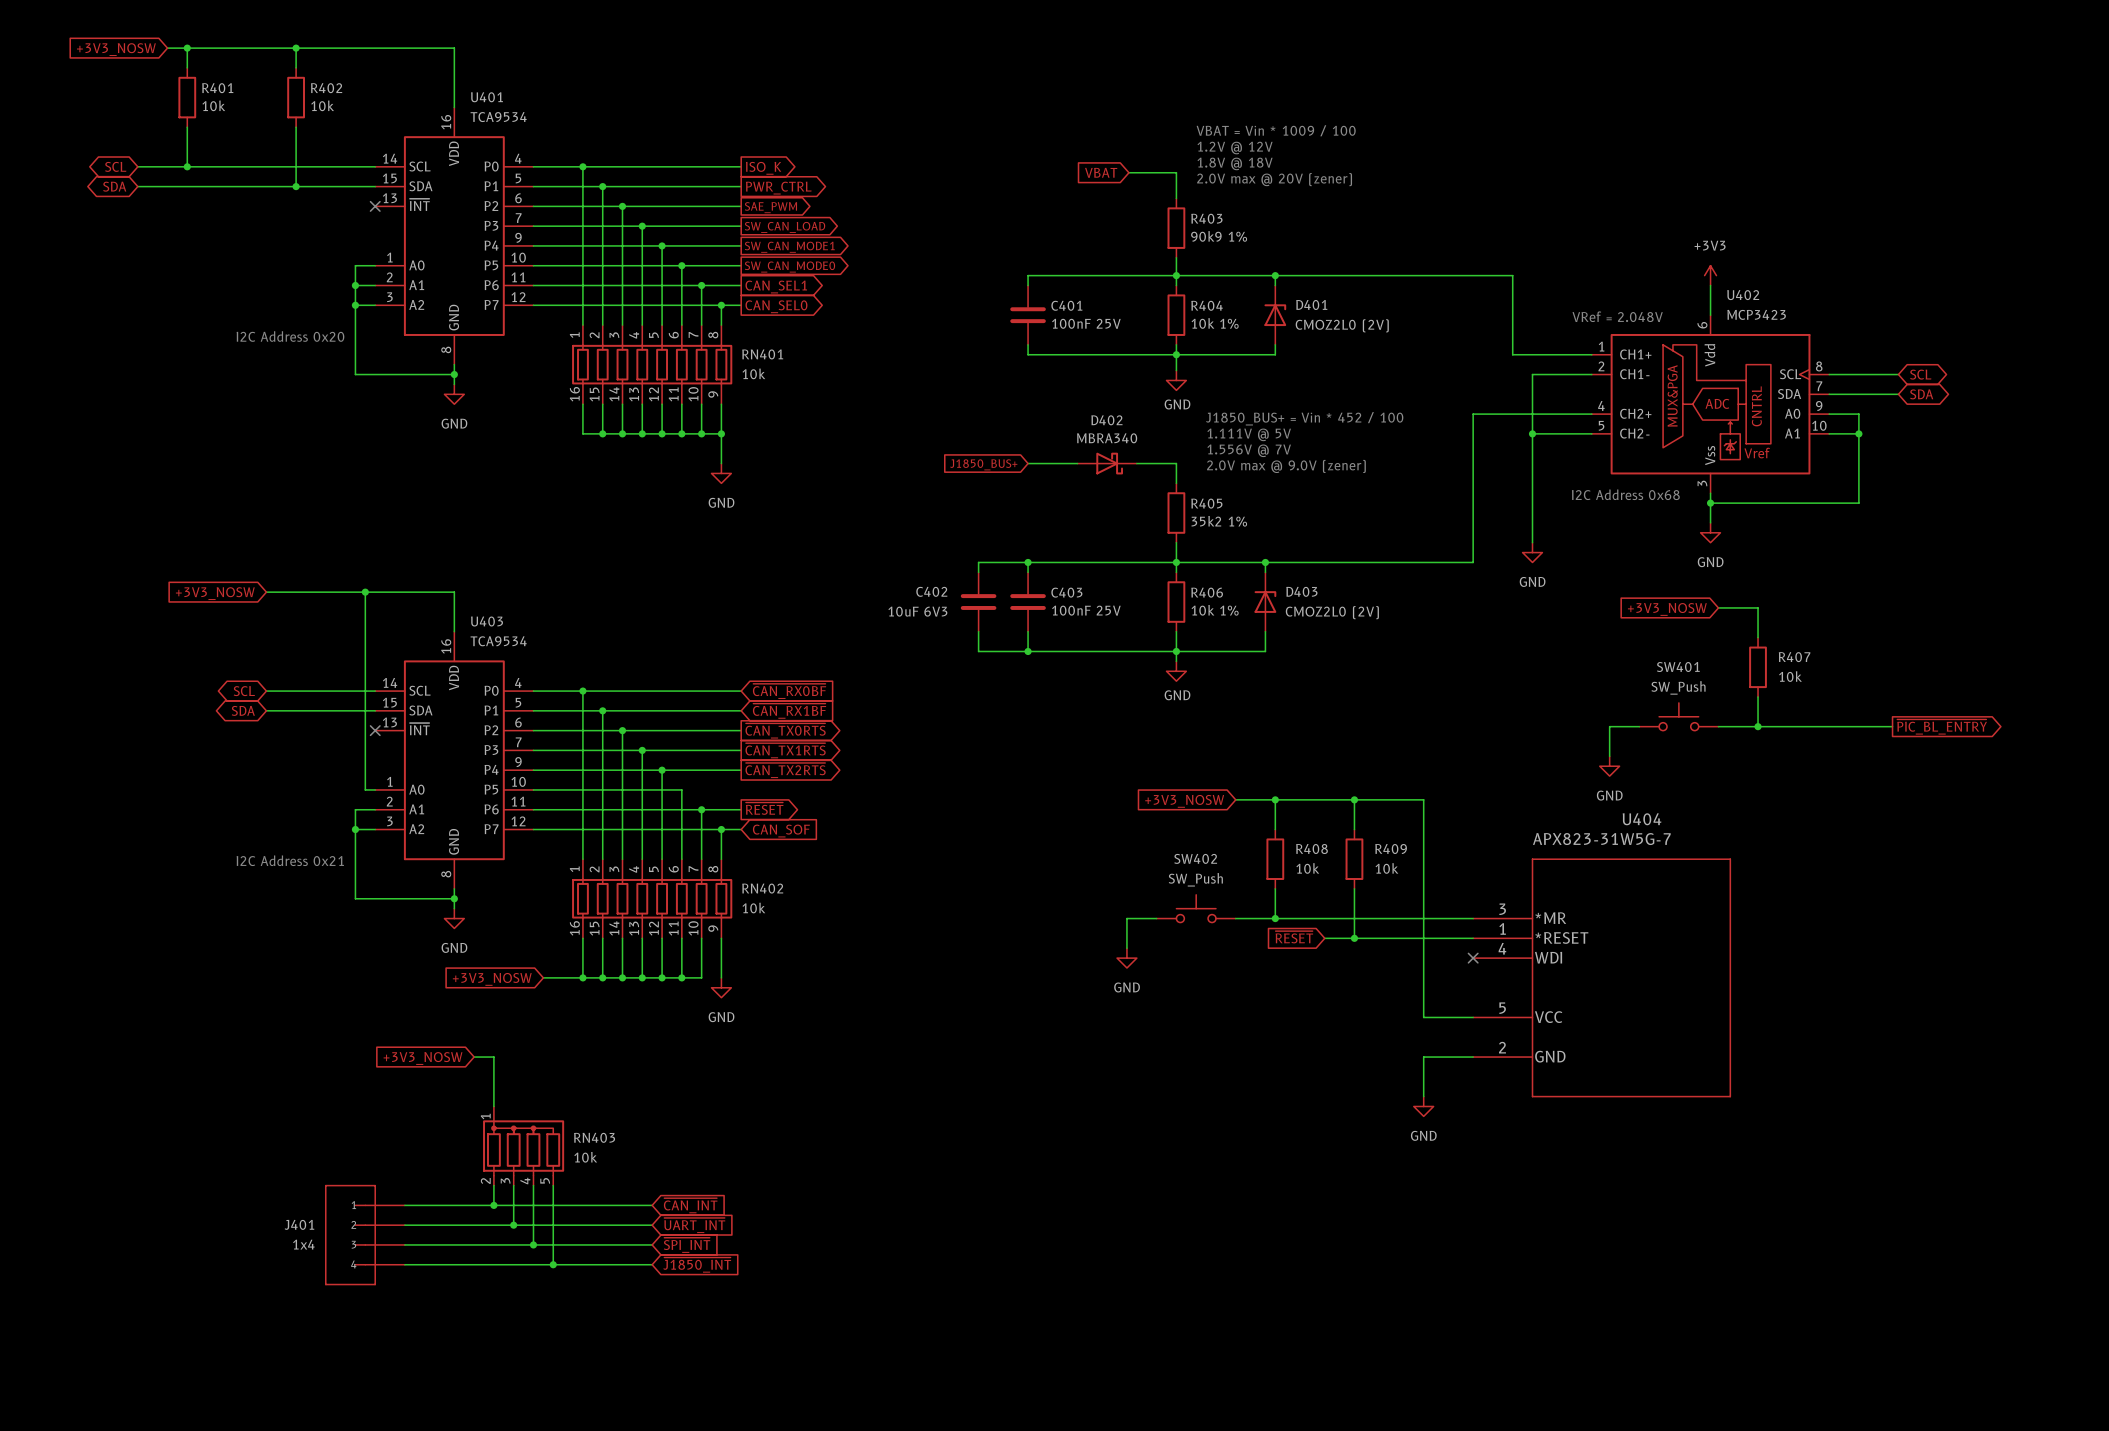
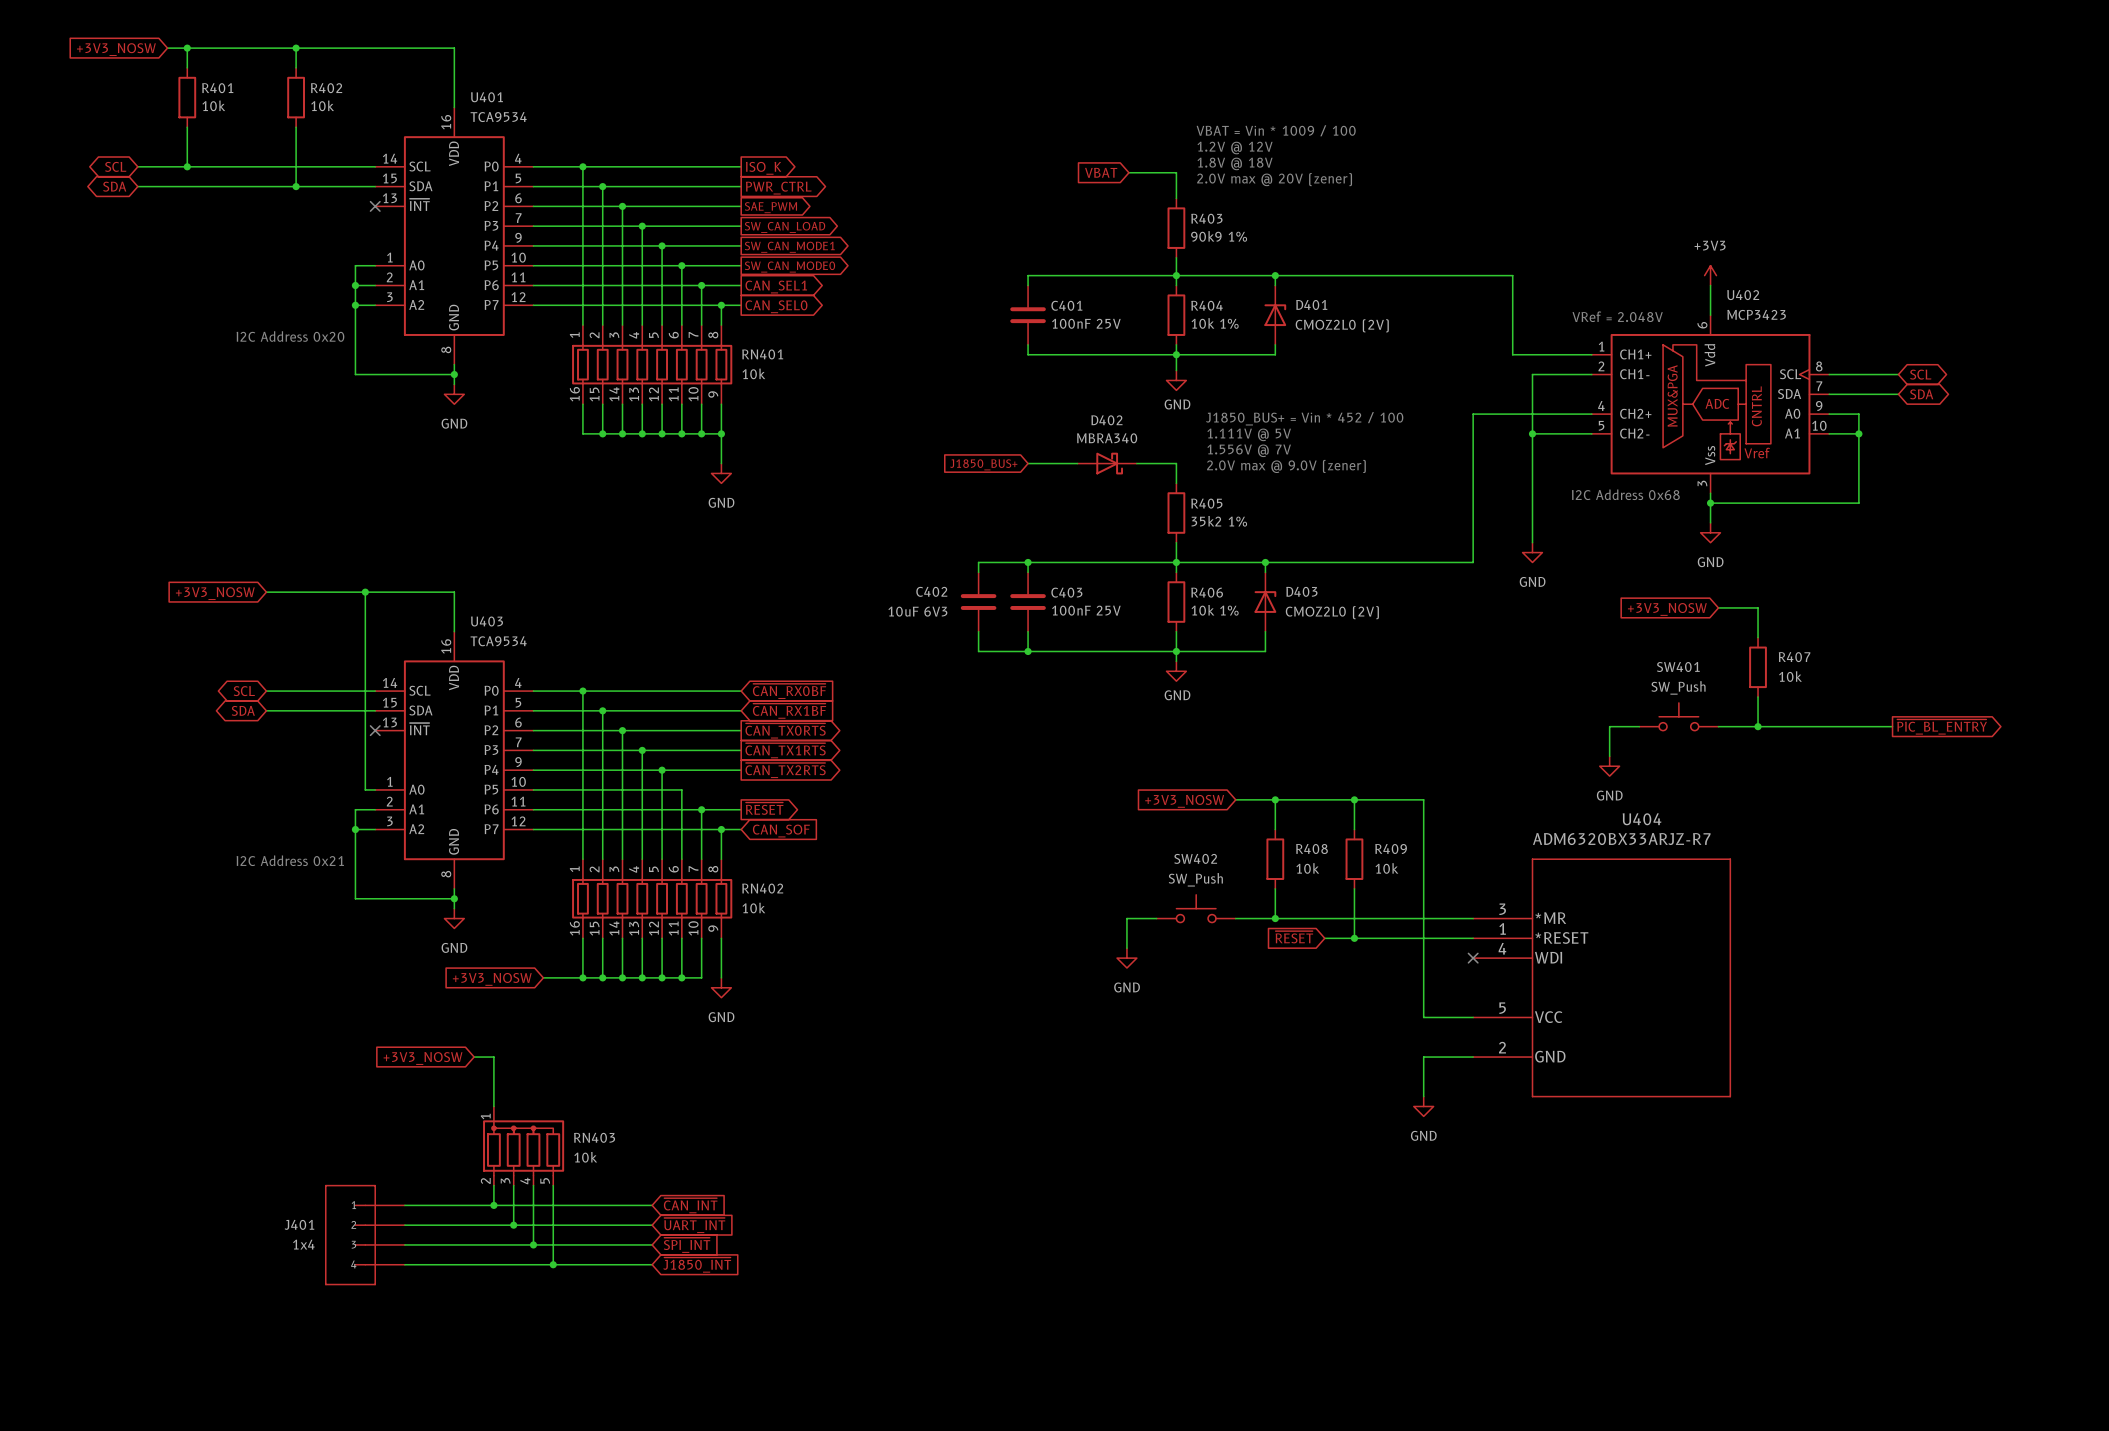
U404 value: APX823-31W5G-7 (1601, 839) -> ADM6320BX33ARJZ-R7 (1621, 839)

